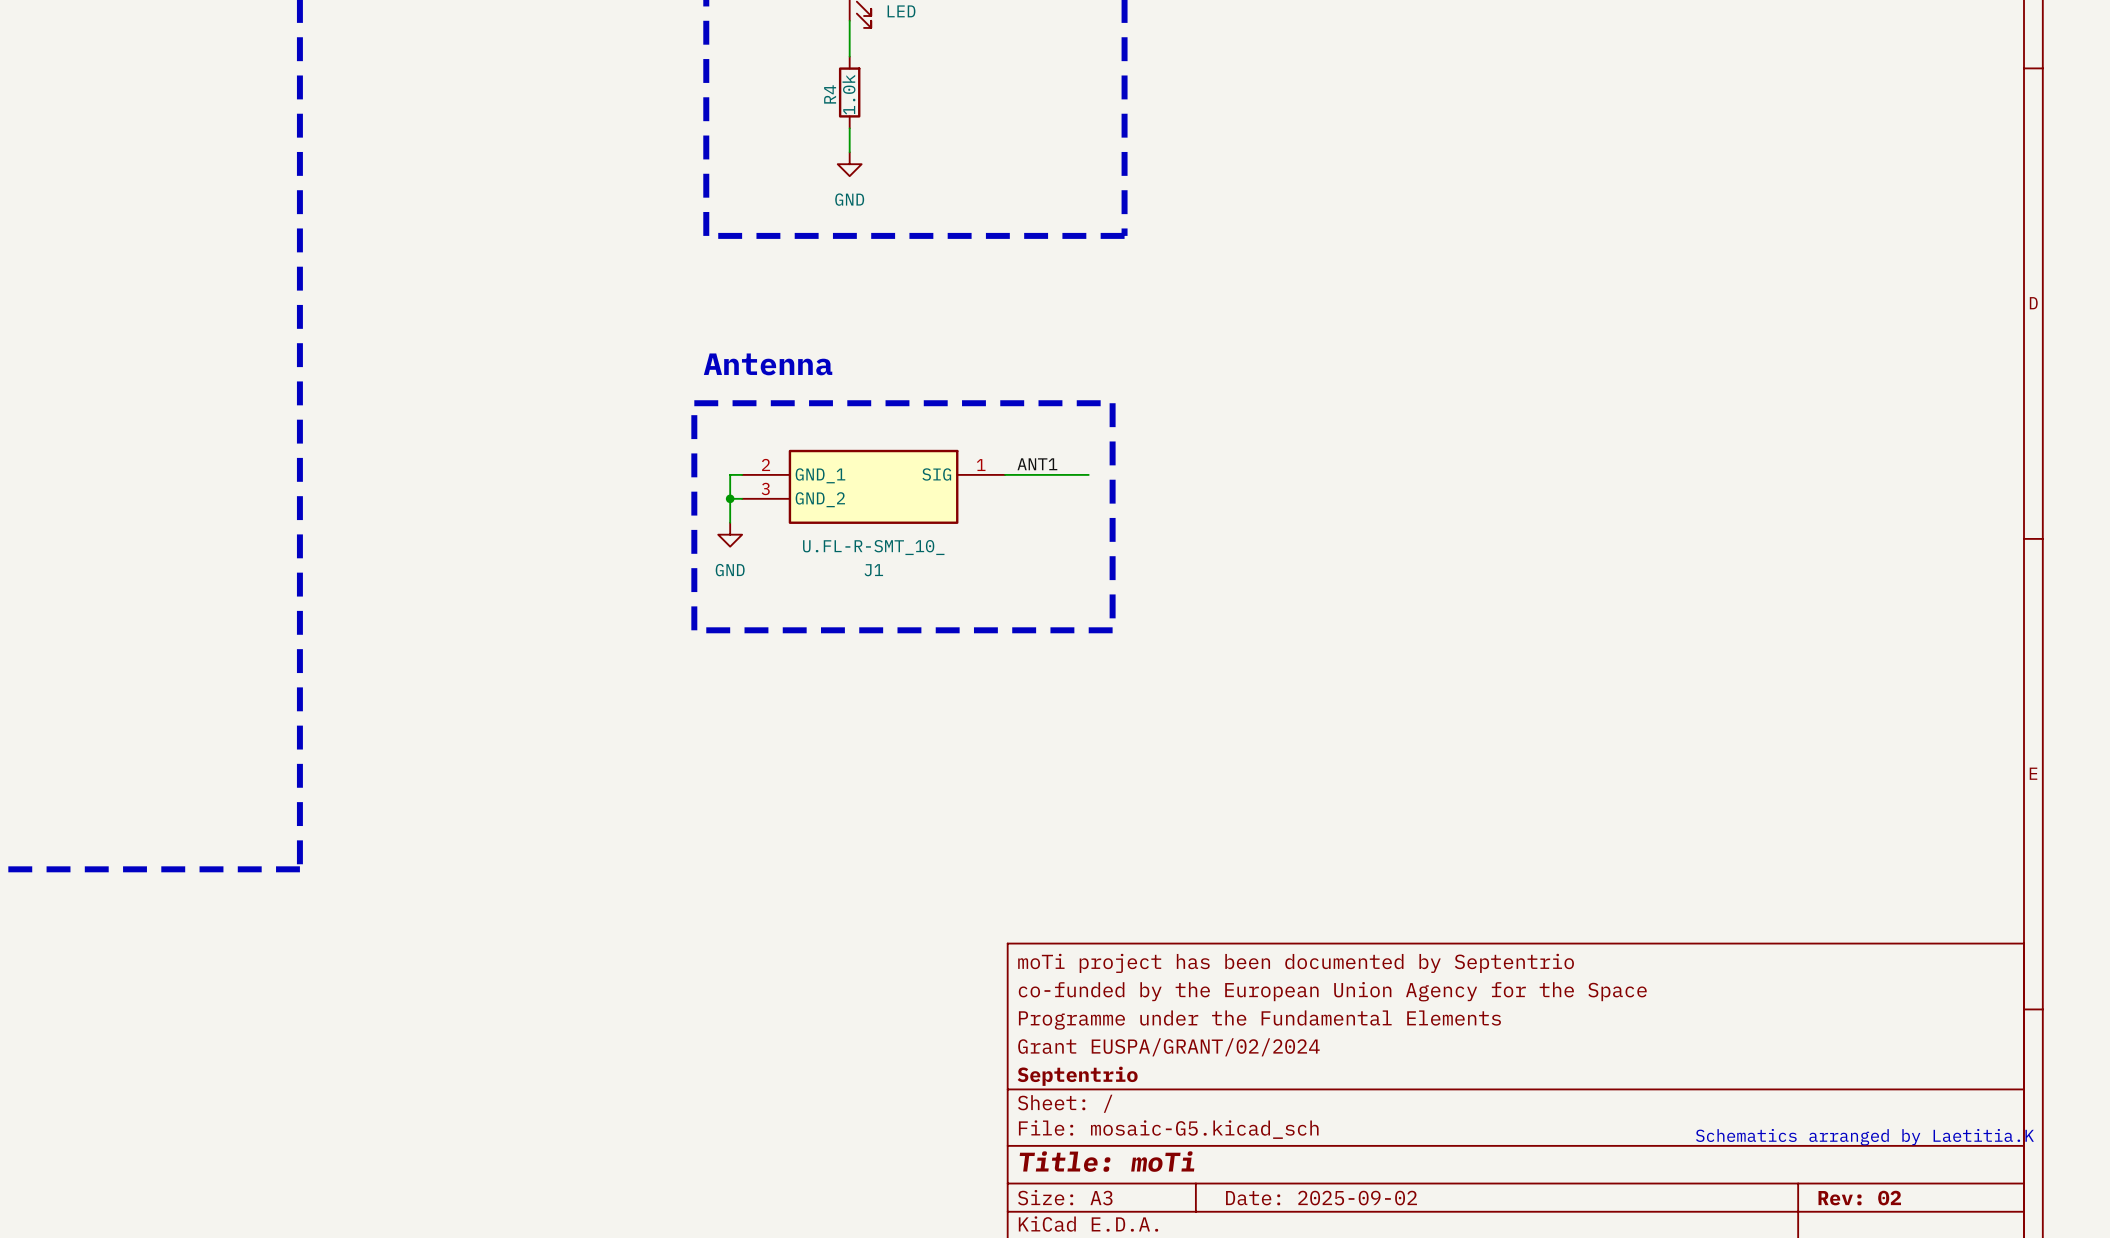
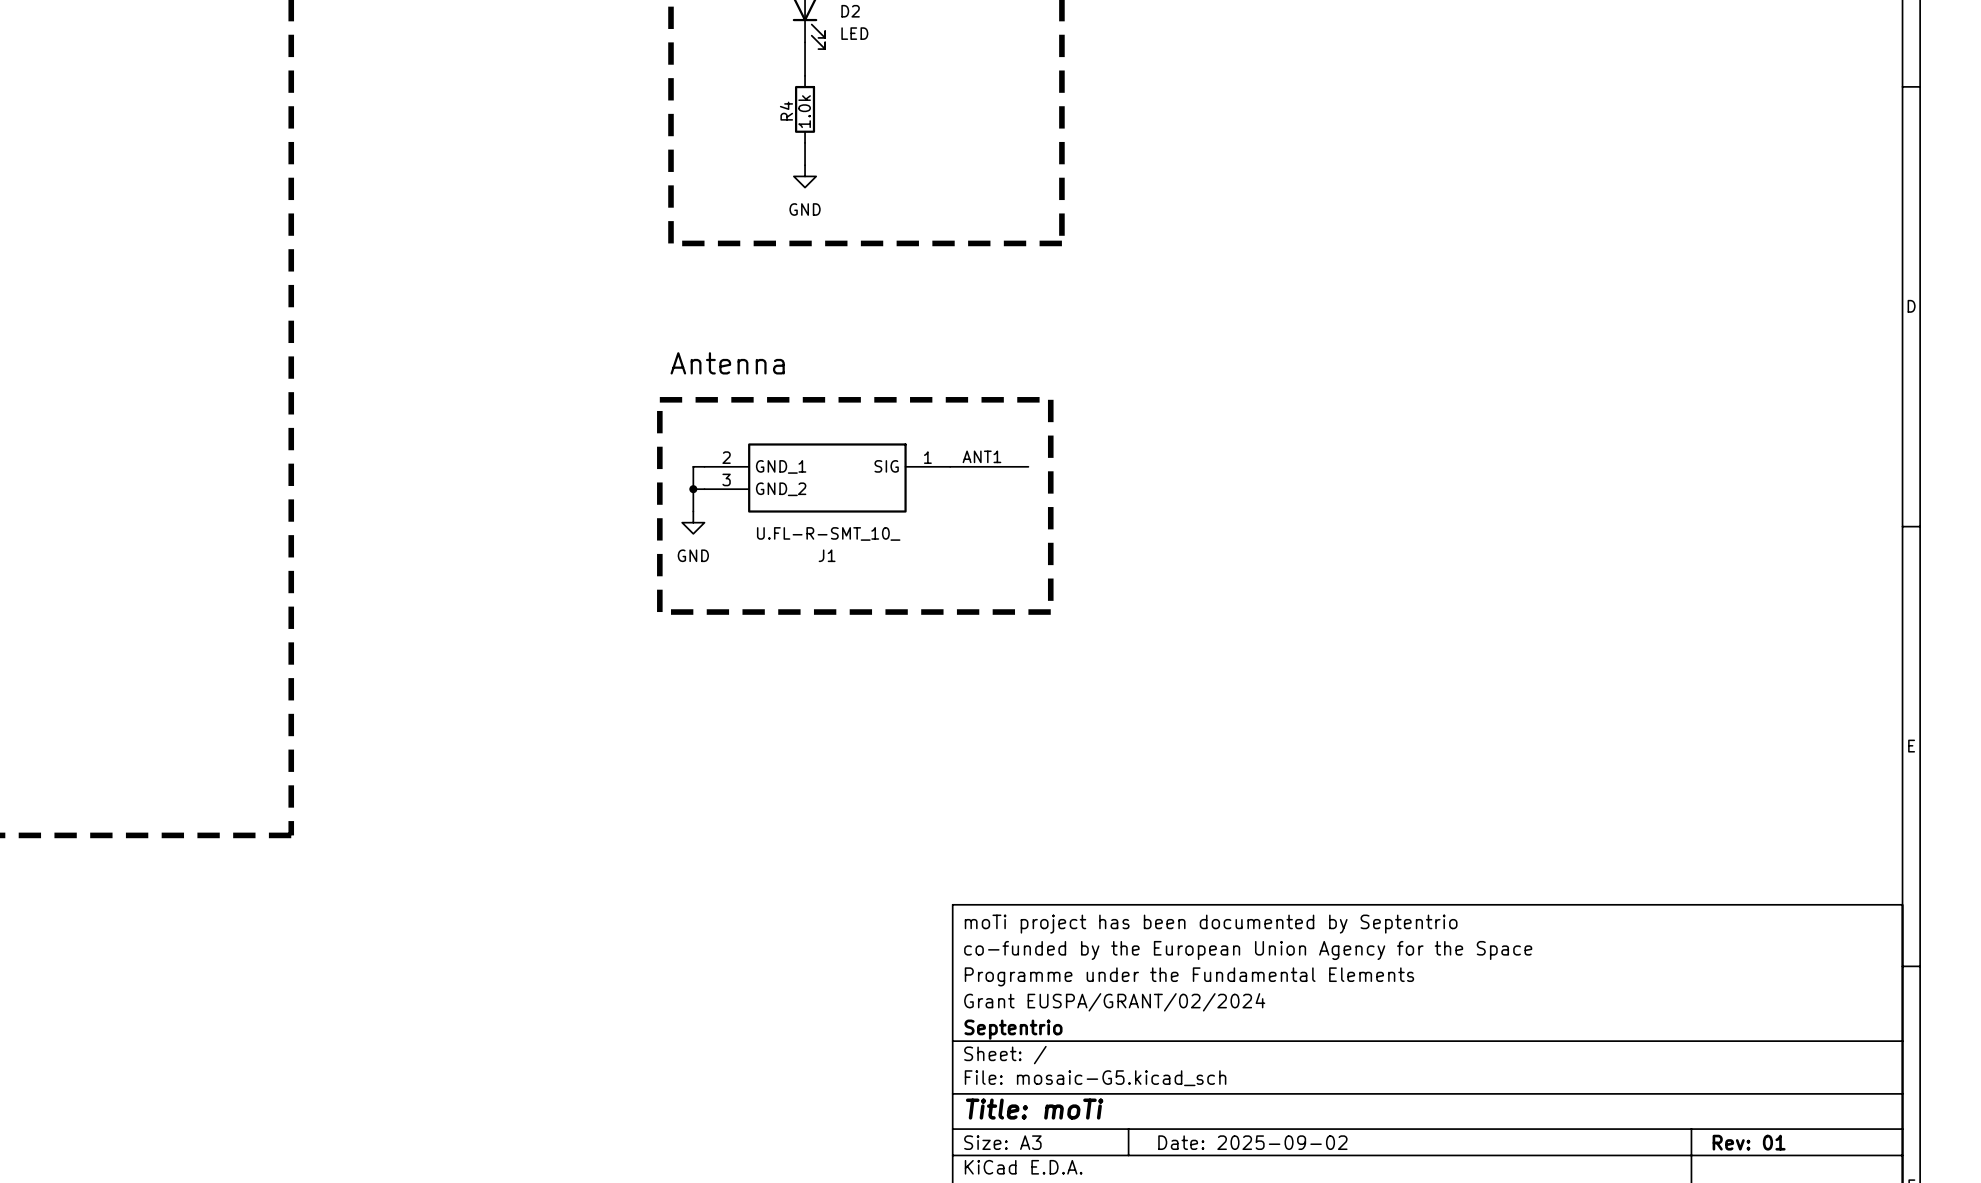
text: Schematics arranged by Laetitia.K (1864, 1137) -> none
title block: Rev: 02 (1859, 1198) -> Rev: 01 (1749, 1142)

